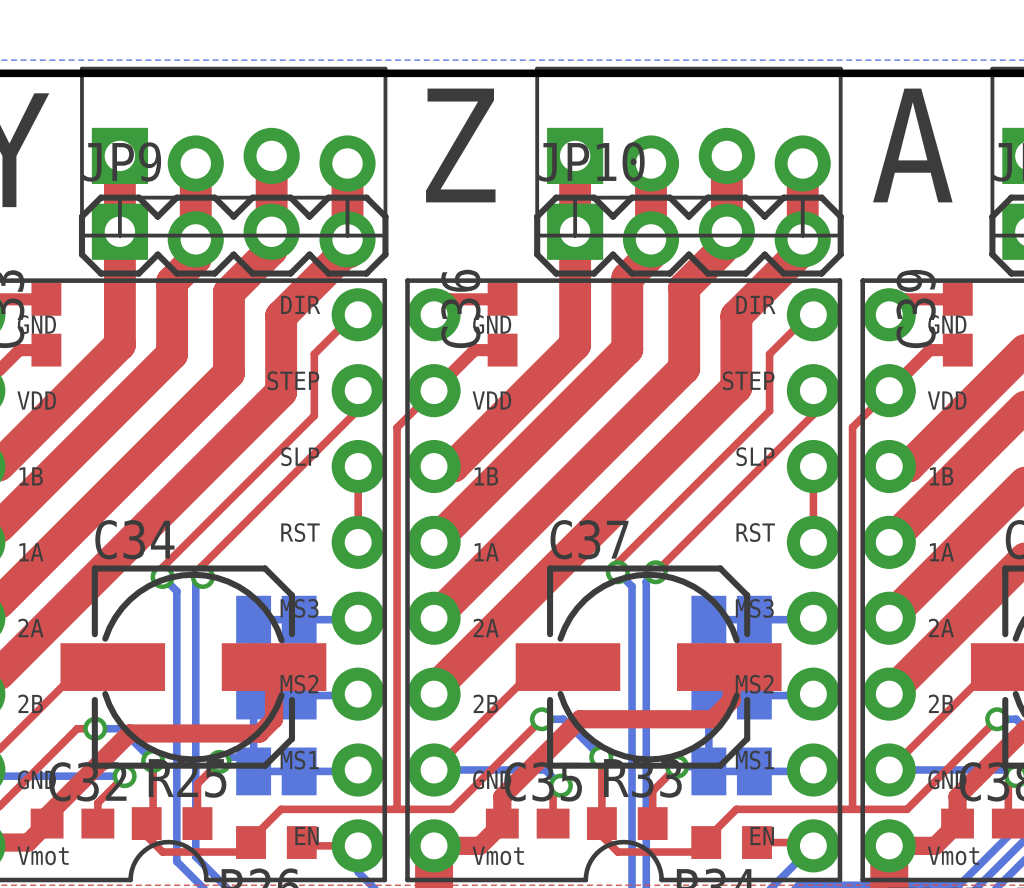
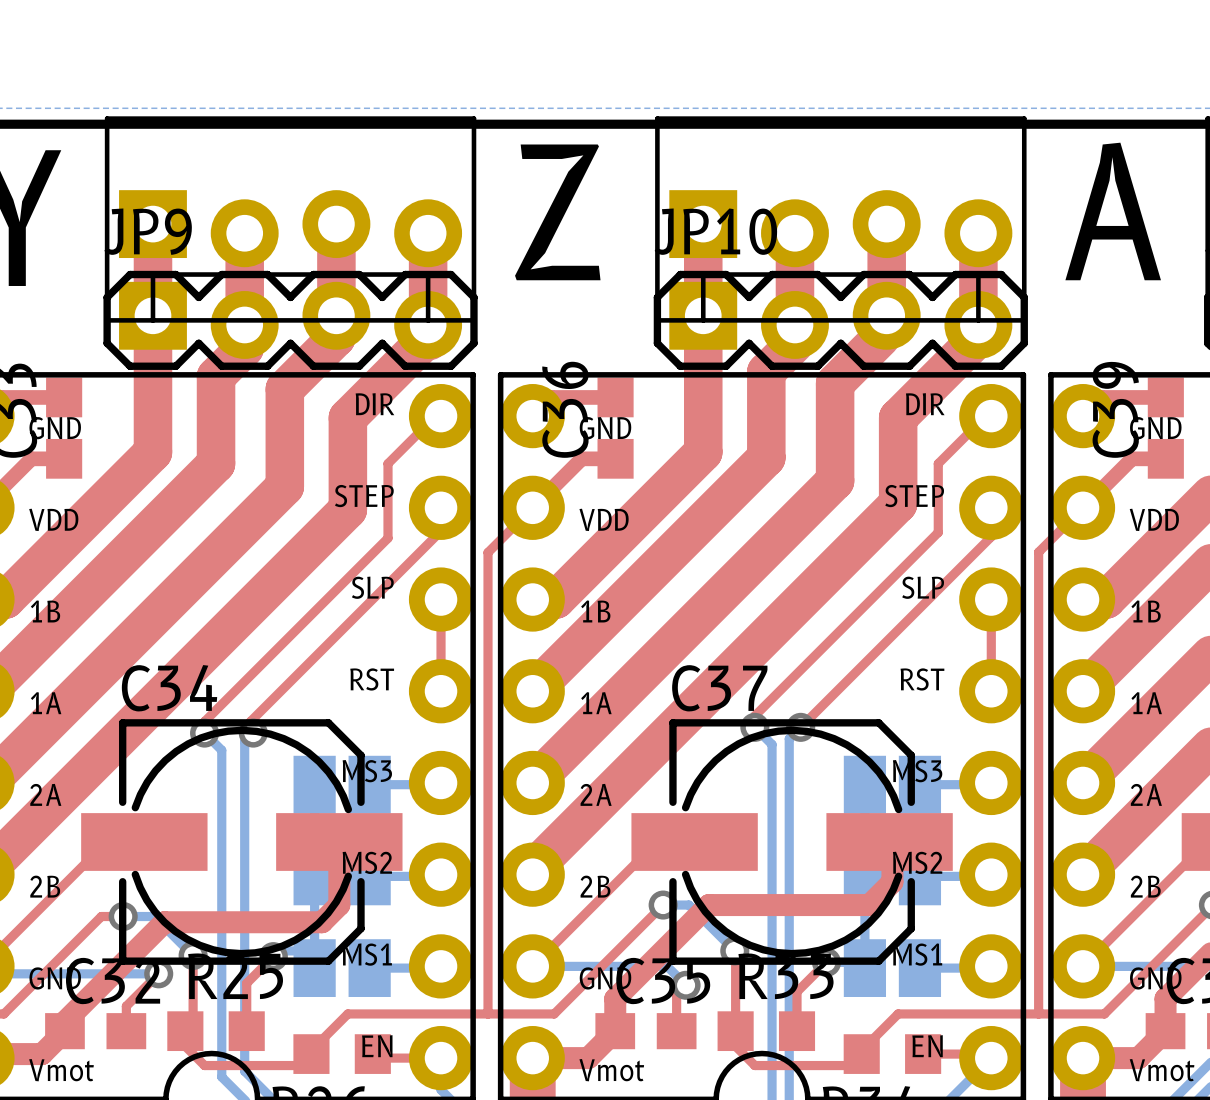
part footprint: [236, 595, 317, 644] -> [293, 755, 391, 814]
part footprint: [691, 595, 772, 644] -> [843, 755, 942, 814]
part footprint: [236, 747, 317, 796] -> [293, 939, 391, 997]
part footprint: [691, 747, 772, 796] -> [843, 939, 942, 997]

